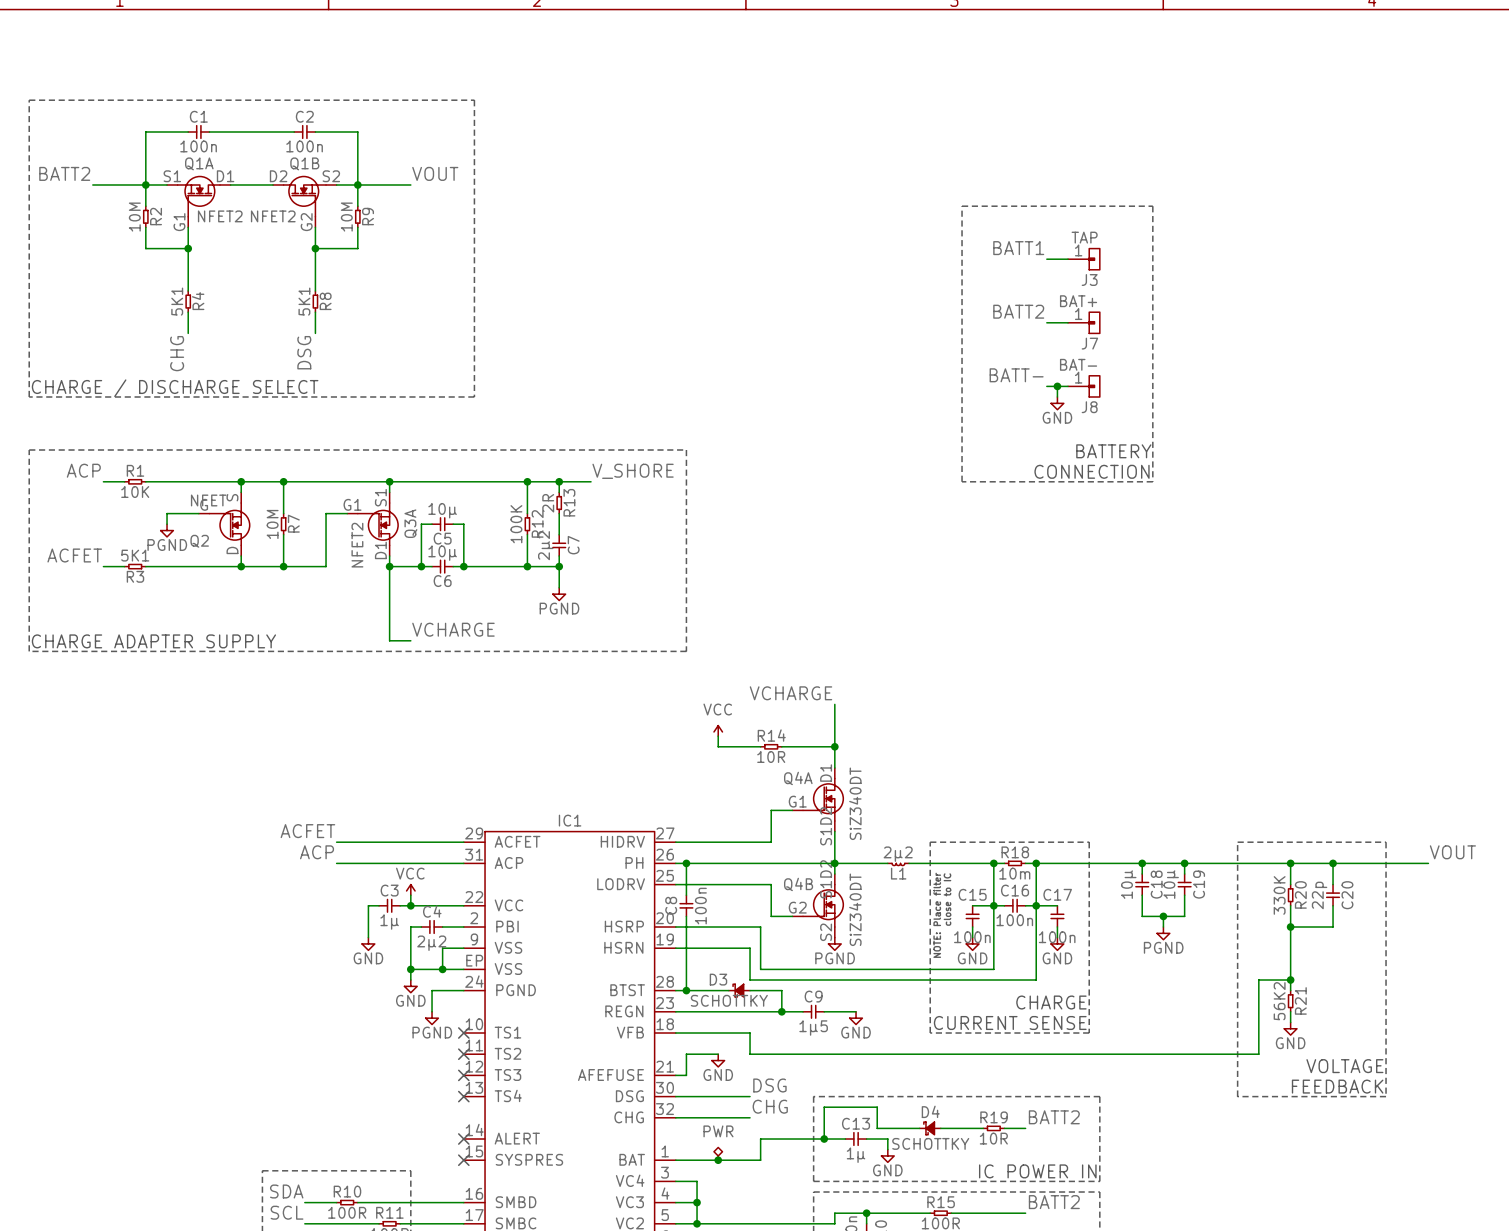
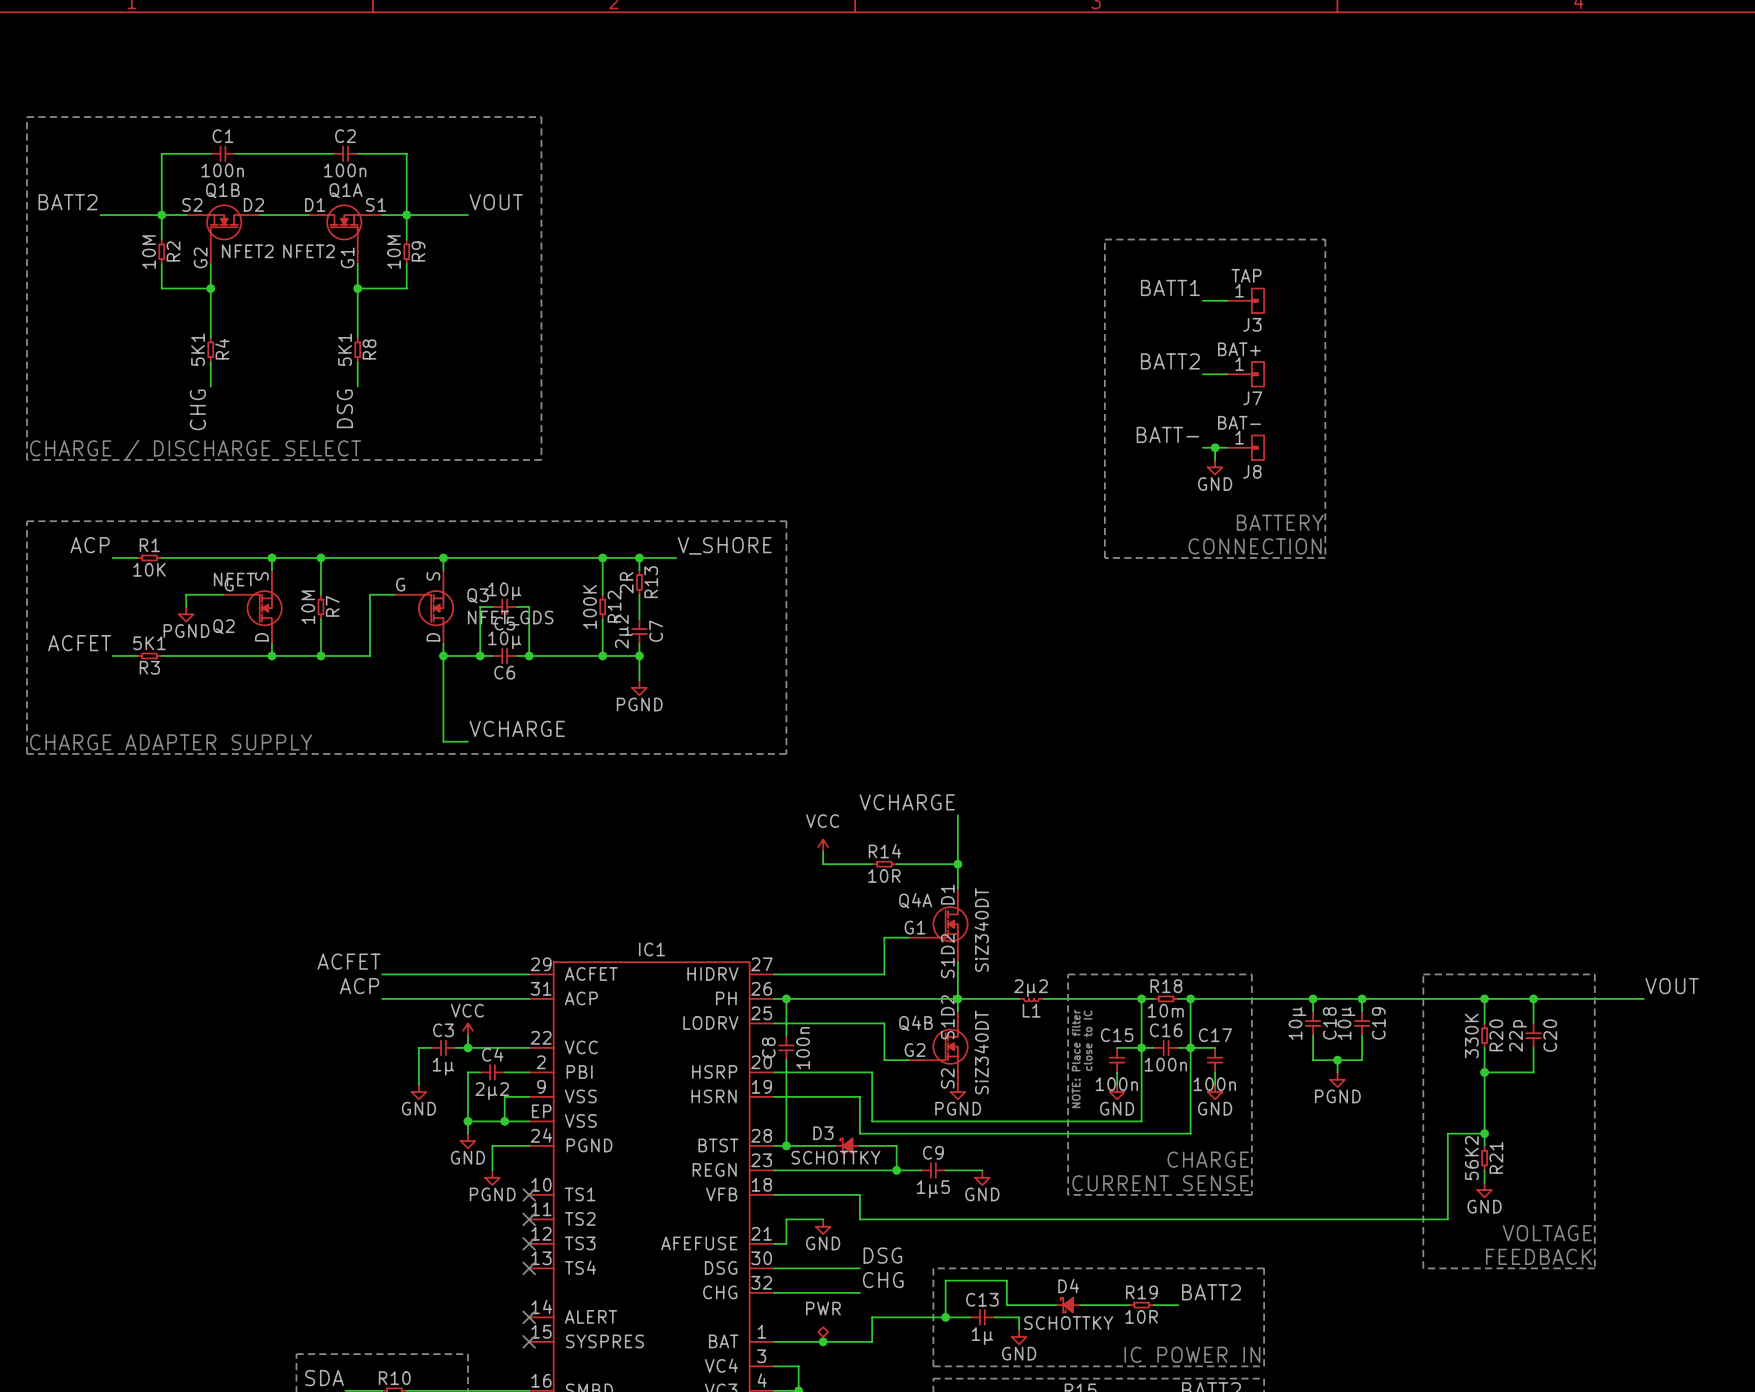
Q1A flip: as is (198, 196) -> left-right (345, 228)
Q1B flip: as is (304, 196) -> left-right (222, 228)
Q1A position: (198, 201) -> (345, 234)
Q1B position: (304, 201) -> (222, 234)
Q3A pin number: S1 (380, 497) -> S (433, 576)
Q3A pin number: G1 (352, 504) -> G (400, 584)
Q3A name: Q3A (410, 523) -> Q3 (477, 595)
Q3A value: NFET2 (357, 545) -> NFET_GDS (510, 618)
Q3A pin number: D1 (380, 550) -> D (433, 637)

